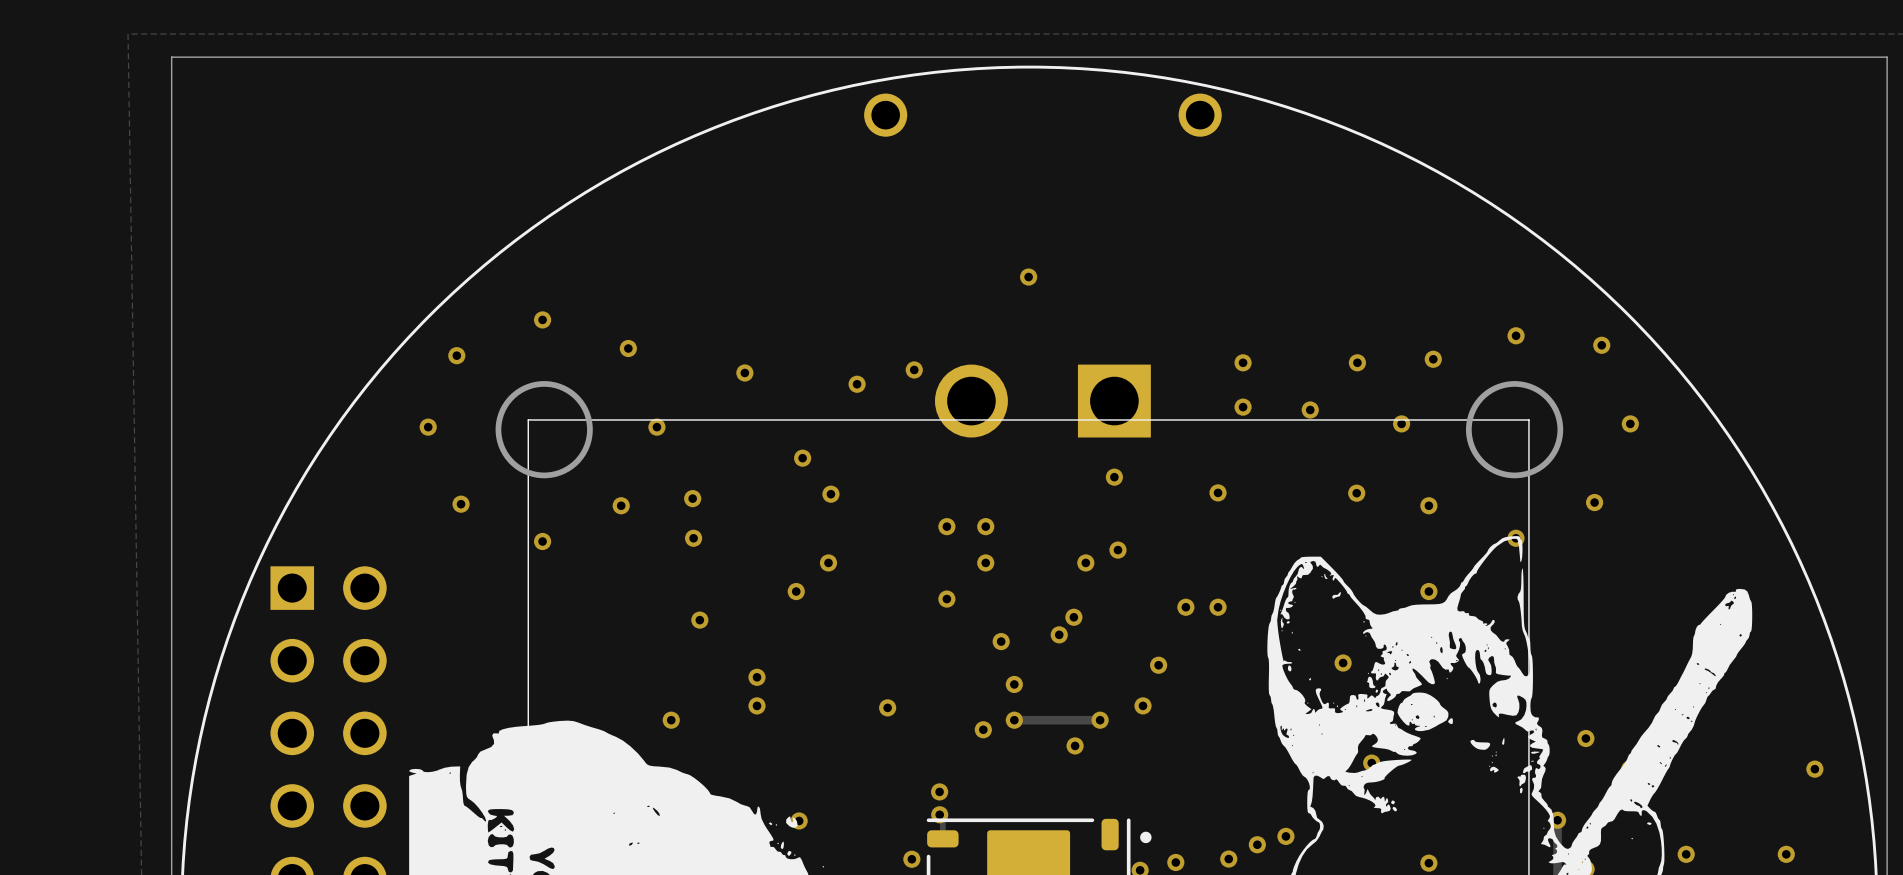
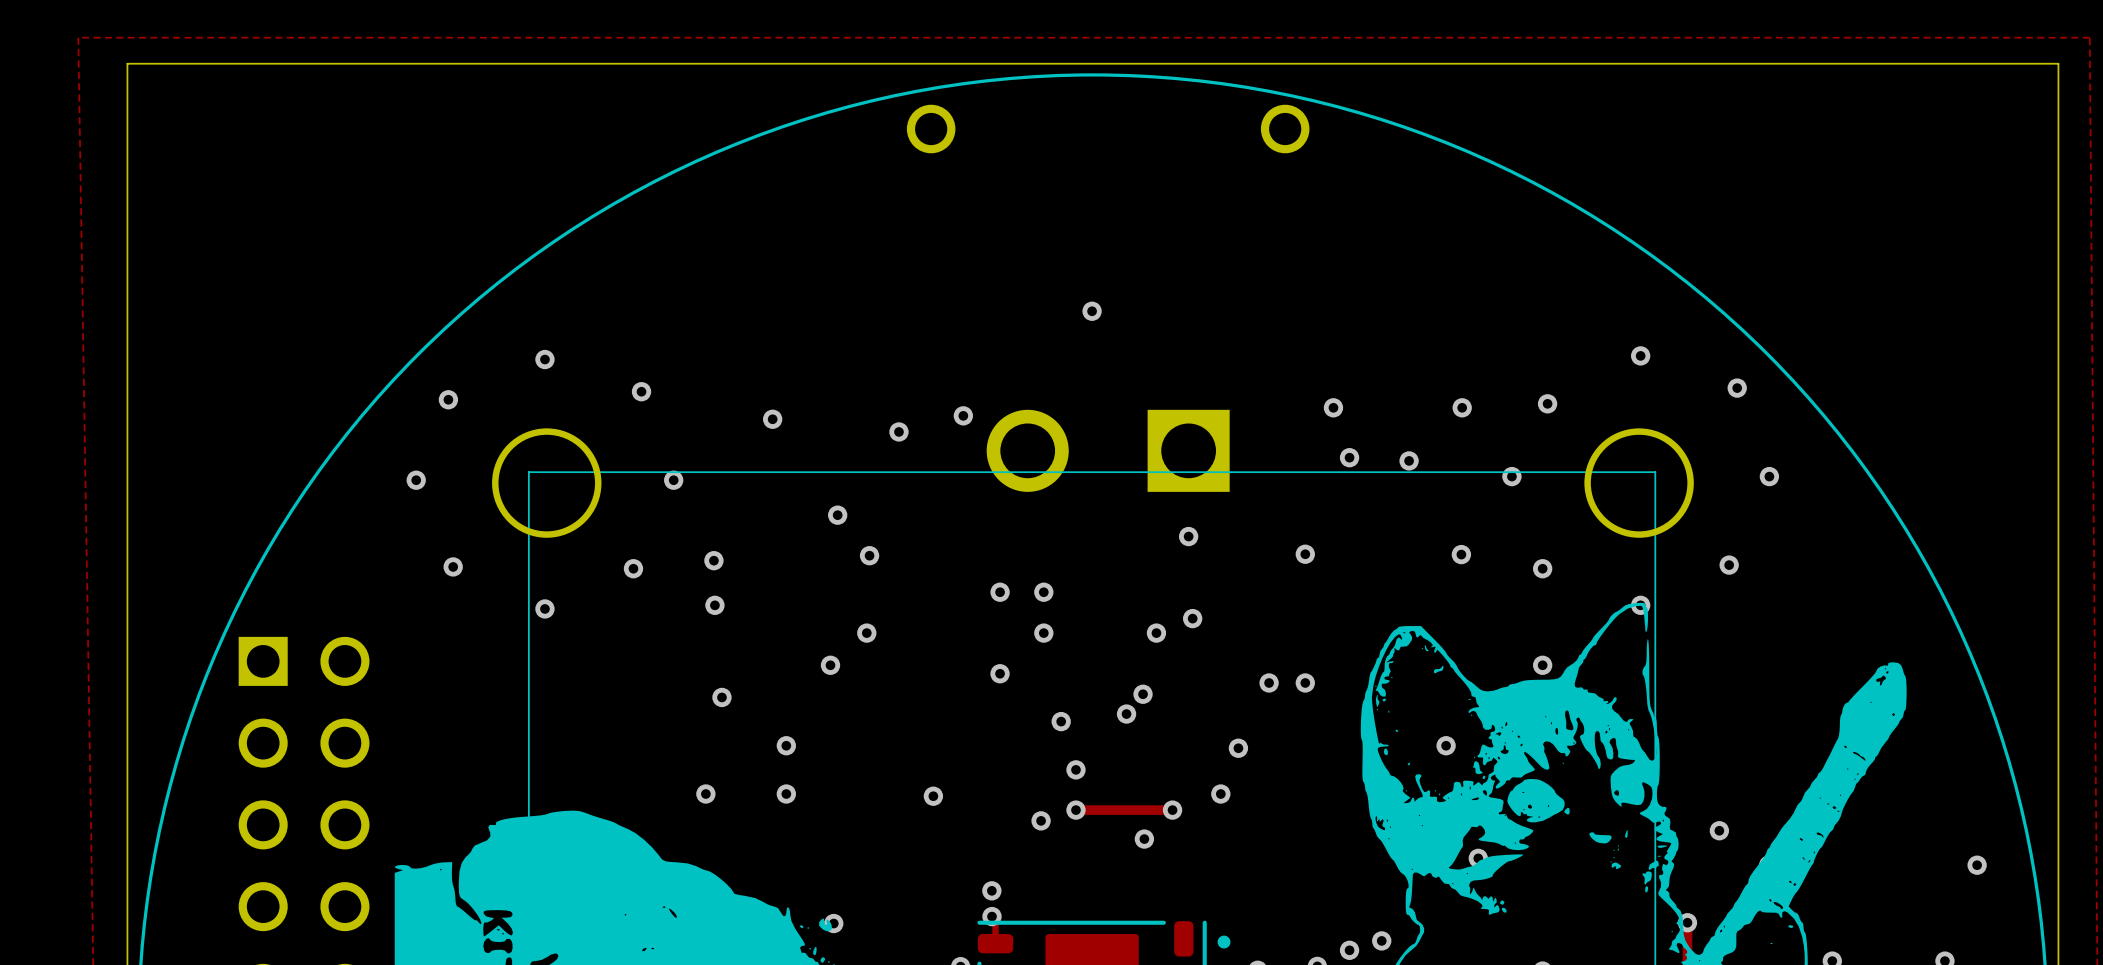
via position: (1516, 335) -> (1640, 355)
via position: (1243, 407) -> (1349, 457)
via position: (757, 677) -> (786, 745)
via position: (671, 720) -> (705, 794)

